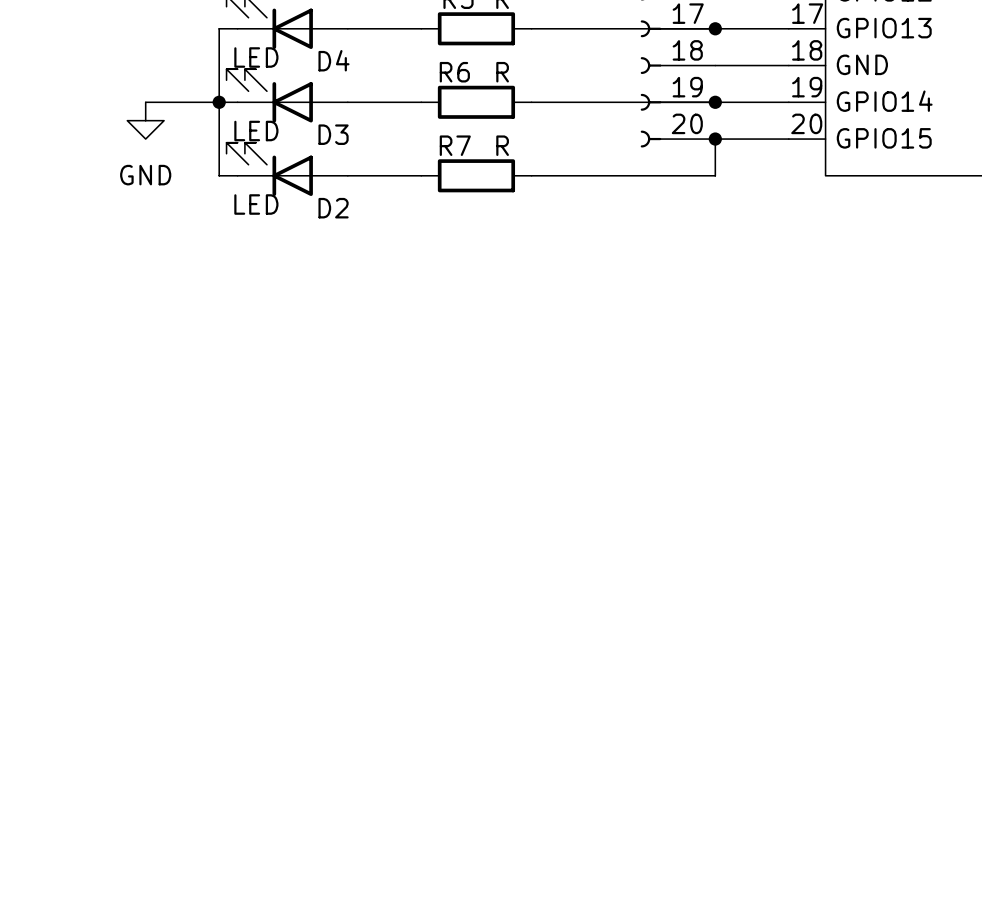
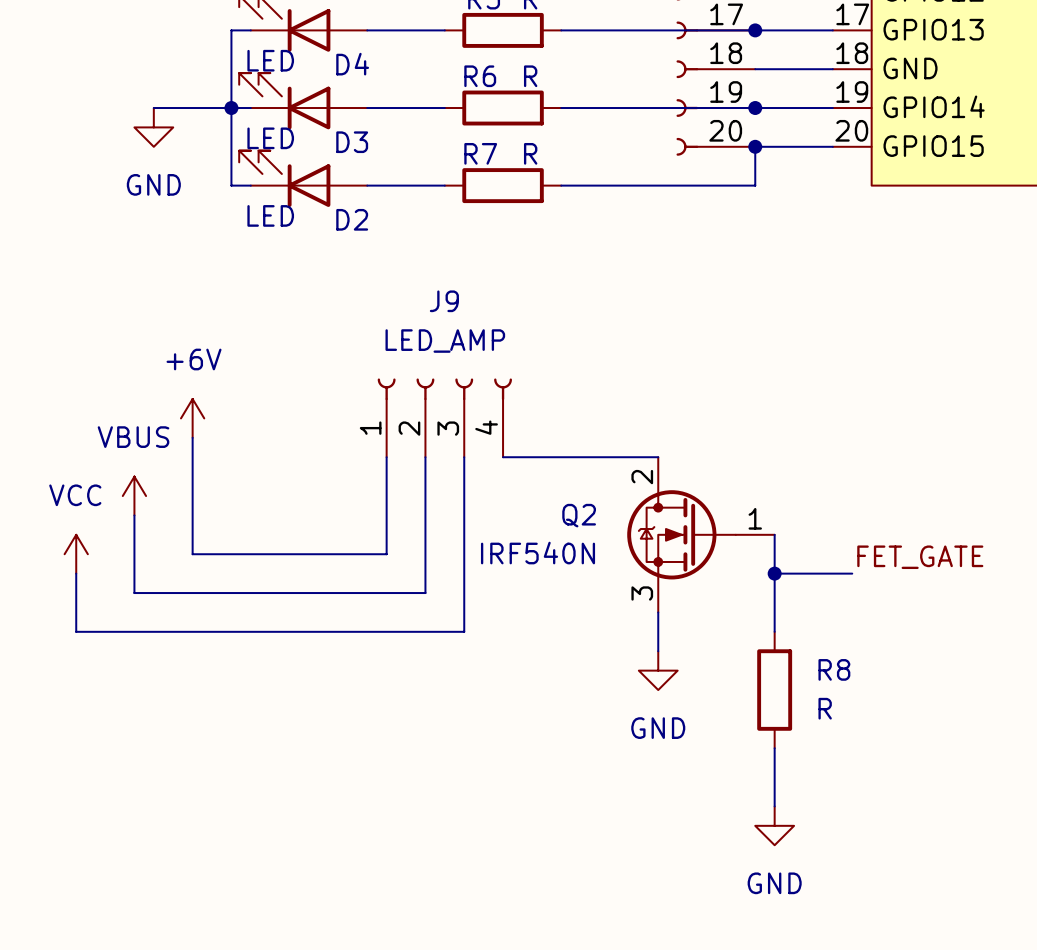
J9: none -> LED_AMP (444, 417)
power symbol: none -> +6V (192, 418)
wire: none -> (192, 437) (192, 554) (386, 554) (386, 457)
wire: none -> (425, 457) (425, 593) (134, 593) (134, 515)
wire: none -> (464, 457) (464, 631) (76, 631) (76, 573)
wire: none -> (503, 457) (658, 457)
power symbol: none -> VBUS (134, 496)
Q2: none -> IRF540N (700, 534)
wire: none -> (774, 534) (774, 631)
power symbol: none -> VCC (76, 554)
label: none -> FET_GATE (920, 557)
wire: none -> (774, 573) (852, 573)
junction: none -> (774, 573)
wire: none -> (658, 612) (658, 651)
power symbol: none -> GND (658, 670)
R8: none -> R (774, 690)
wire: none -> (774, 748) (774, 806)
power symbol: none -> GND (774, 825)

